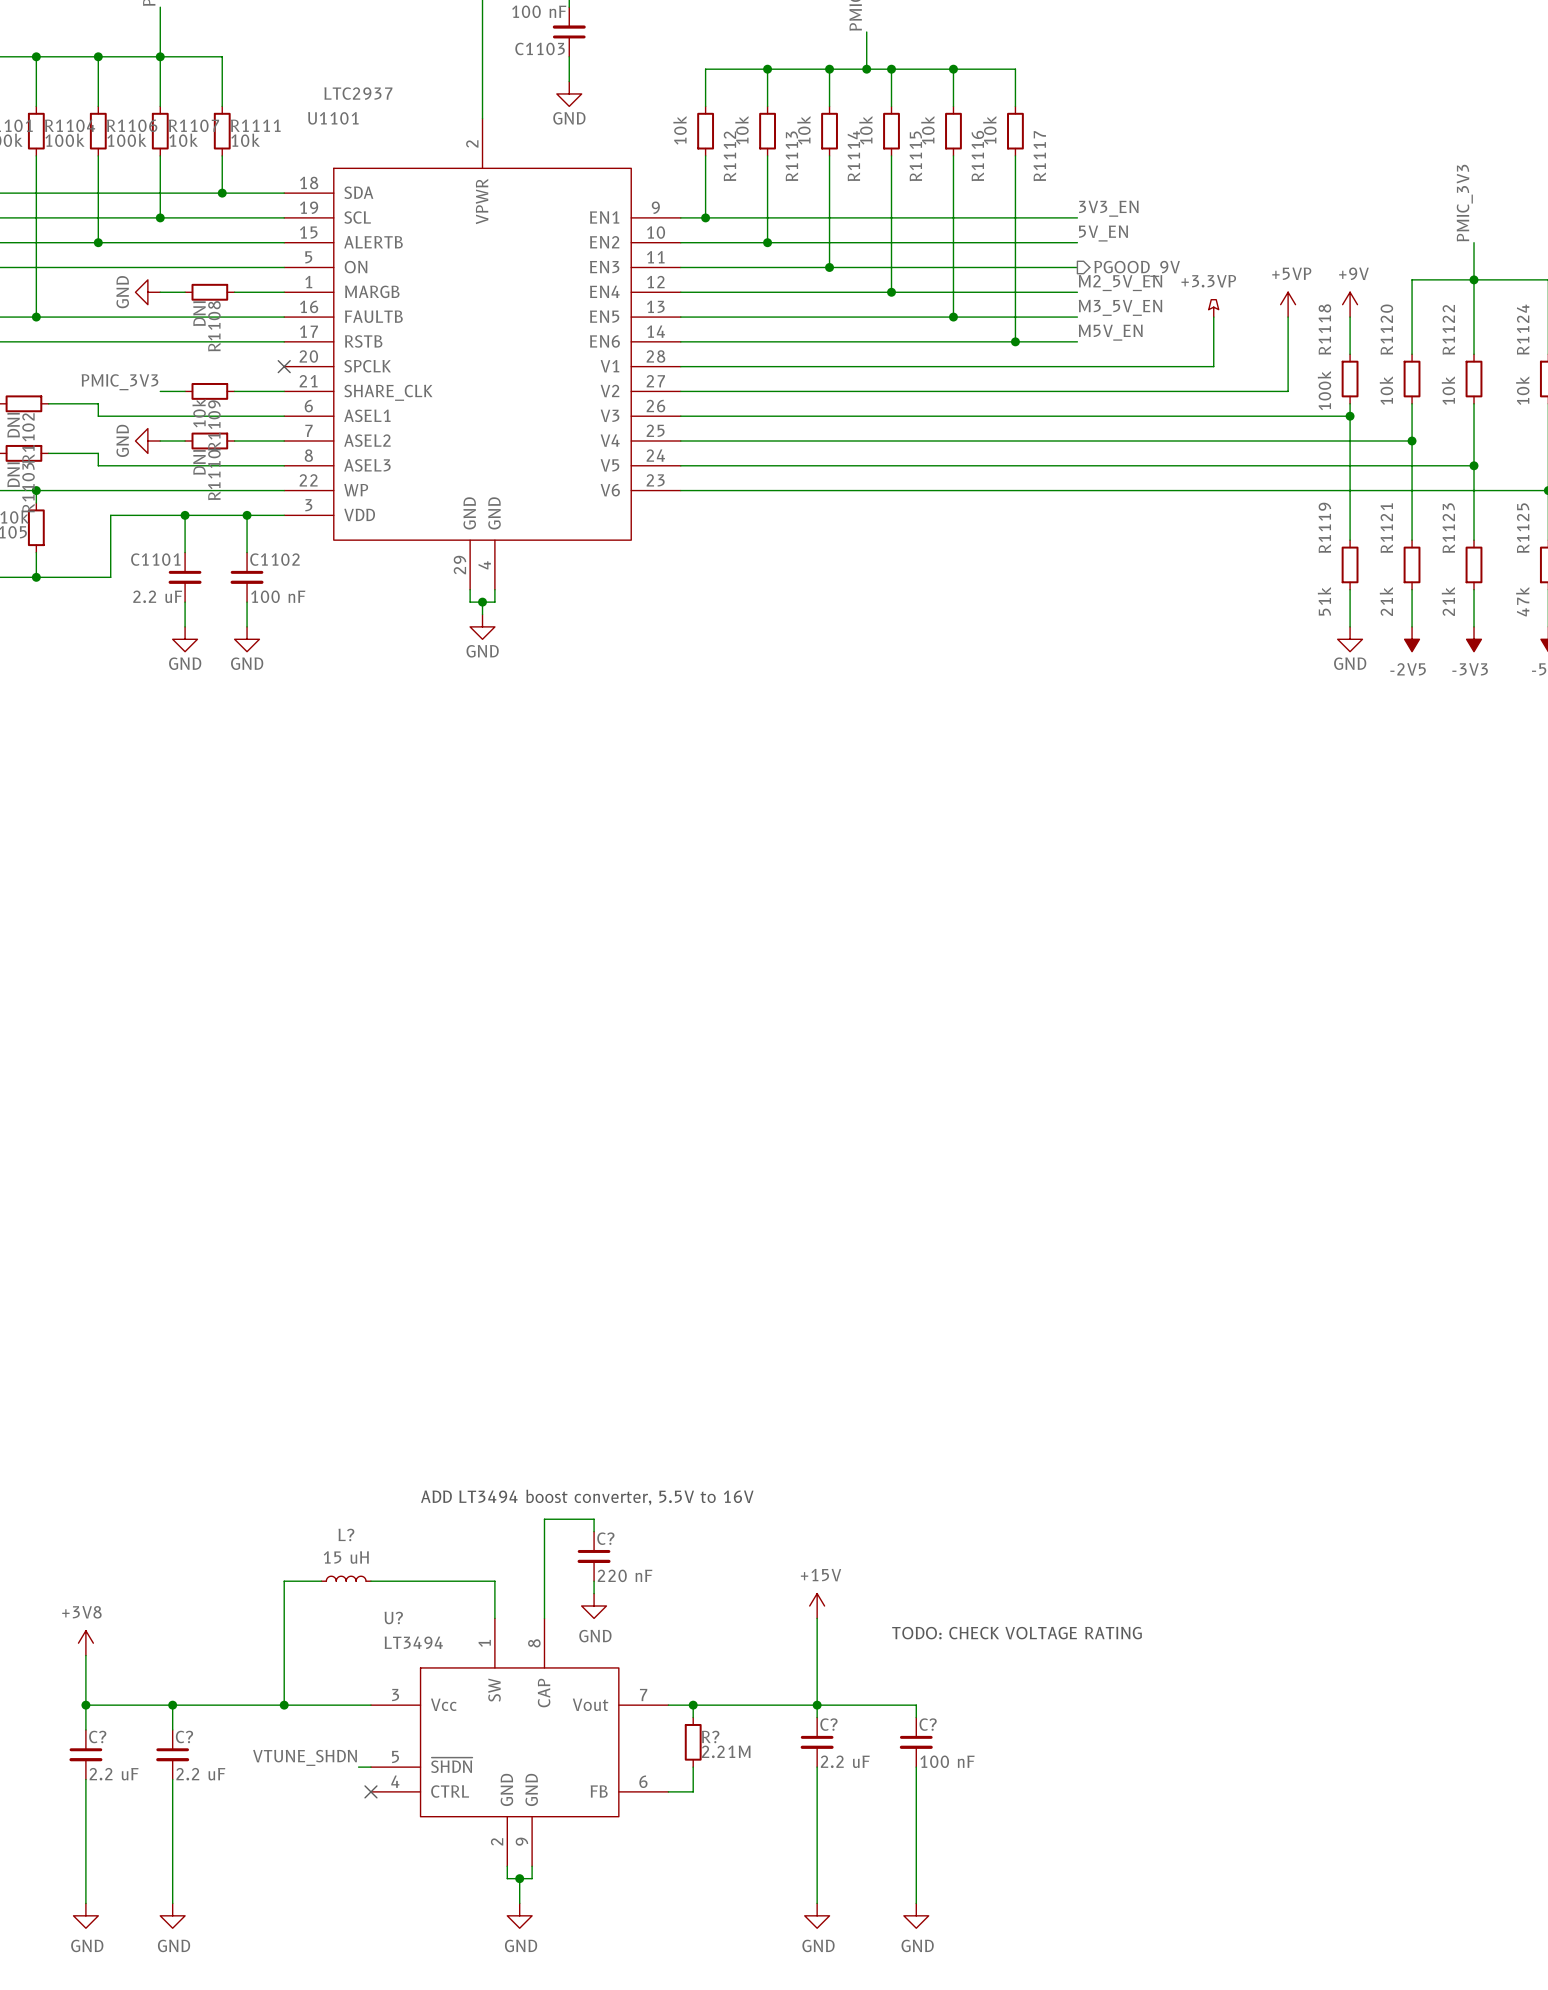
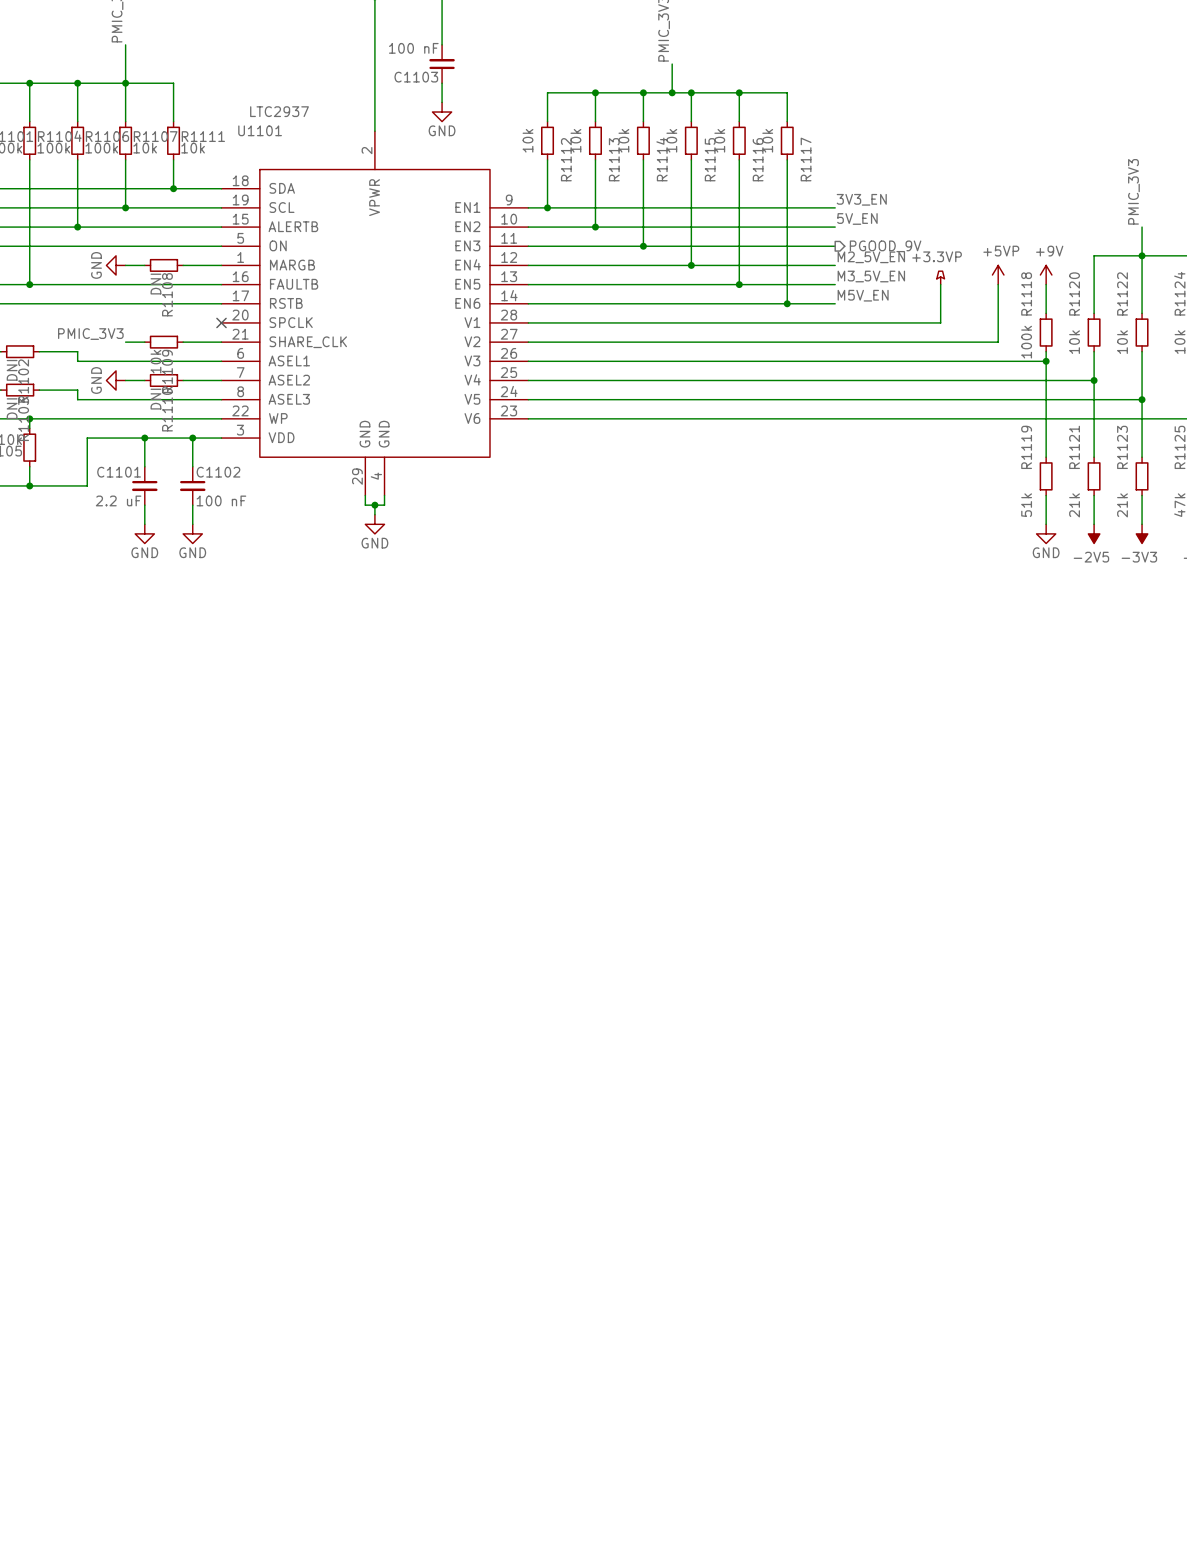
text: ADD LT3494 boost converter, 5.5V to 16V (587, 1497) -> none
wire: (594, 1531) (594, 1519) (544, 1519) (544, 1618) -> none
C?: 220 nF (594, 1556) -> none
L?: 15 uH (346, 1578) -> none
wire: (321, 1581) (284, 1581) (284, 1705) -> none
wire: (370, 1581) (494, 1581) (494, 1618) -> none
wire: (594, 1581) (594, 1593) -> none
power symbol: GND (594, 1606) -> none
power symbol: +15V (817, 1606) -> none
wire: (817, 1618) (817, 1717) -> none
text: TODO: CHECK VOLTAGE RATING (1016, 1633) -> none
power symbol: +3V8 (85, 1643) -> none
wire: (85, 1655) (85, 1729) -> none
wire: (85, 1705) (370, 1705) -> none
junction: (85, 1705) -> none
wire: (172, 1705) (172, 1729) -> none
junction: (172, 1705) -> none
junction: (284, 1705) -> none
wire: (668, 1705) (916, 1705) (916, 1717) -> none
wire: (693, 1705) (693, 1717) -> none
junction: (693, 1705) -> none
junction: (817, 1705) -> none
U?: LT3494 (519, 1742) -> none
R?: 2.21M (693, 1742) -> none
C?: 2.2 uF (817, 1742) -> none
C?: 100 nF (916, 1742) -> none
C?: 2.2 uF (85, 1754) -> none
C?: 2.2 uF (172, 1754) -> none
label: VTUNE_SHDN (305, 1757) -> none
wire: (358, 1767) (370, 1767) -> none
wire: (693, 1767) (693, 1791) (668, 1791) -> none
wire: (817, 1767) (817, 1903) -> none
wire: (916, 1767) (916, 1903) -> none
wire: (85, 1779) (85, 1903) -> none
wire: (172, 1779) (172, 1903) -> none
no-connect mark: (370, 1791) -> none
wire: (507, 1866) (507, 1878) (532, 1878) (532, 1866) -> none
wire: (519, 1878) (519, 1903) -> none
junction: (519, 1878) -> none
power symbol: GND (85, 1915) -> none
power symbol: GND (172, 1915) -> none
power symbol: GND (519, 1915) -> none
power symbol: GND (817, 1915) -> none
power symbol: GND (916, 1915) -> none

